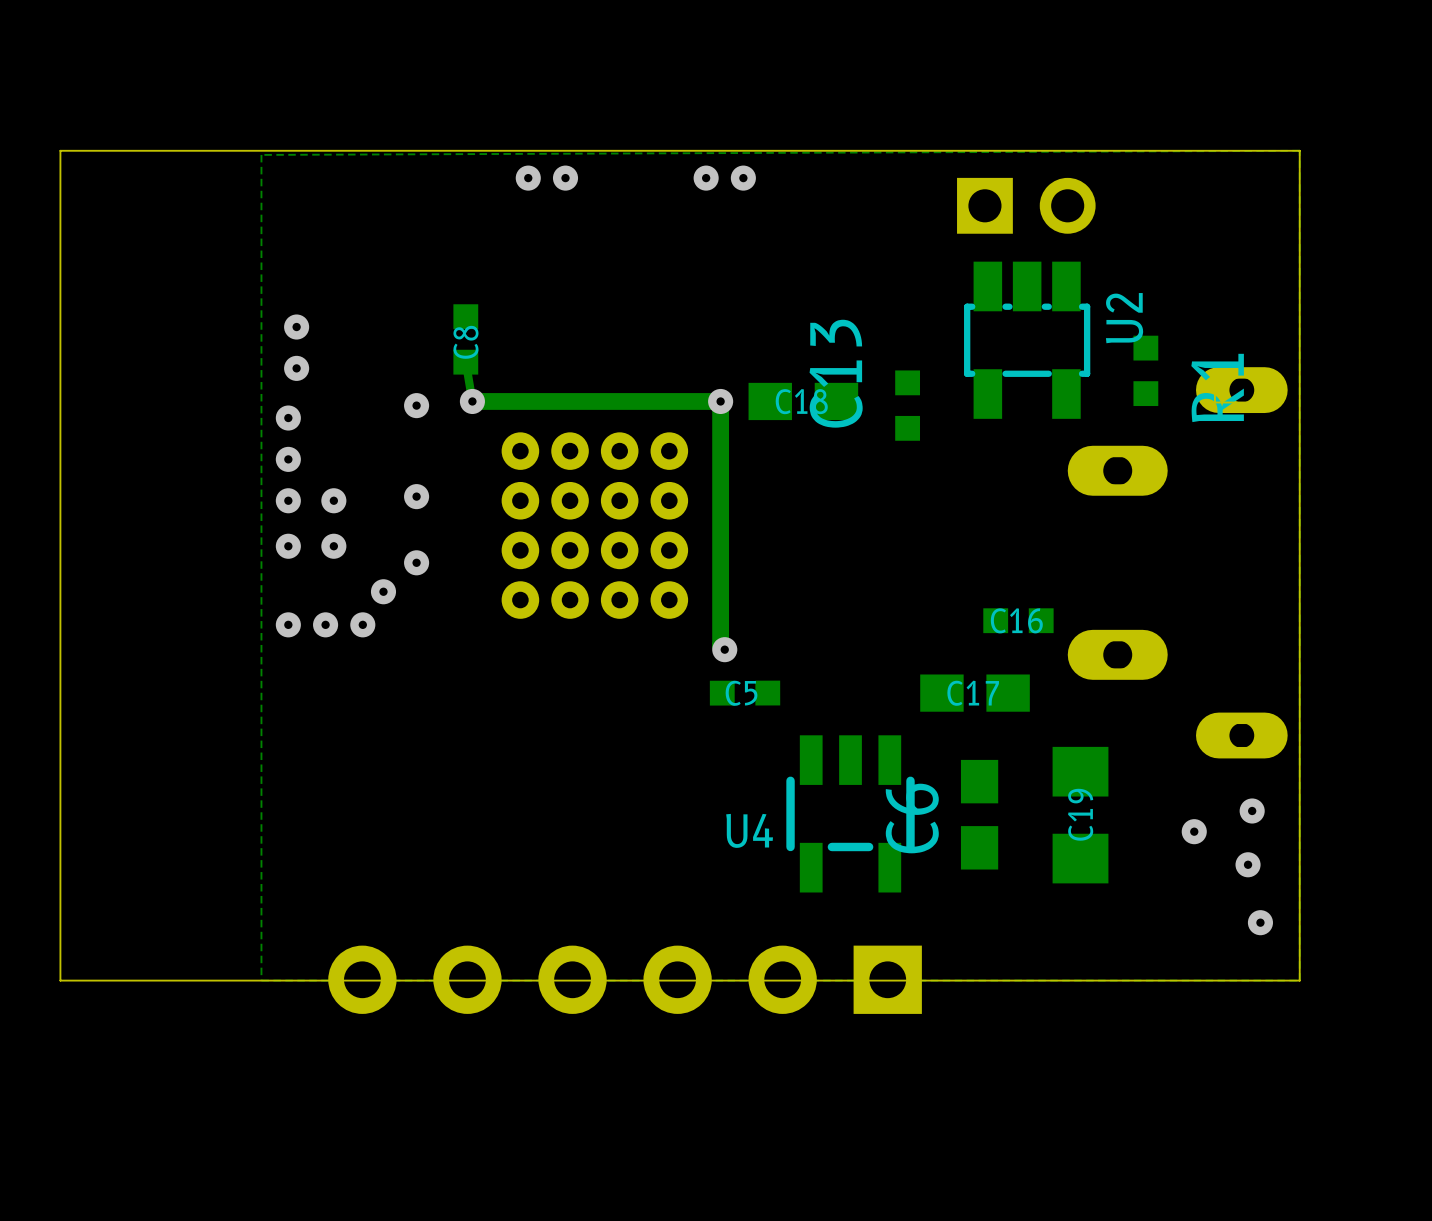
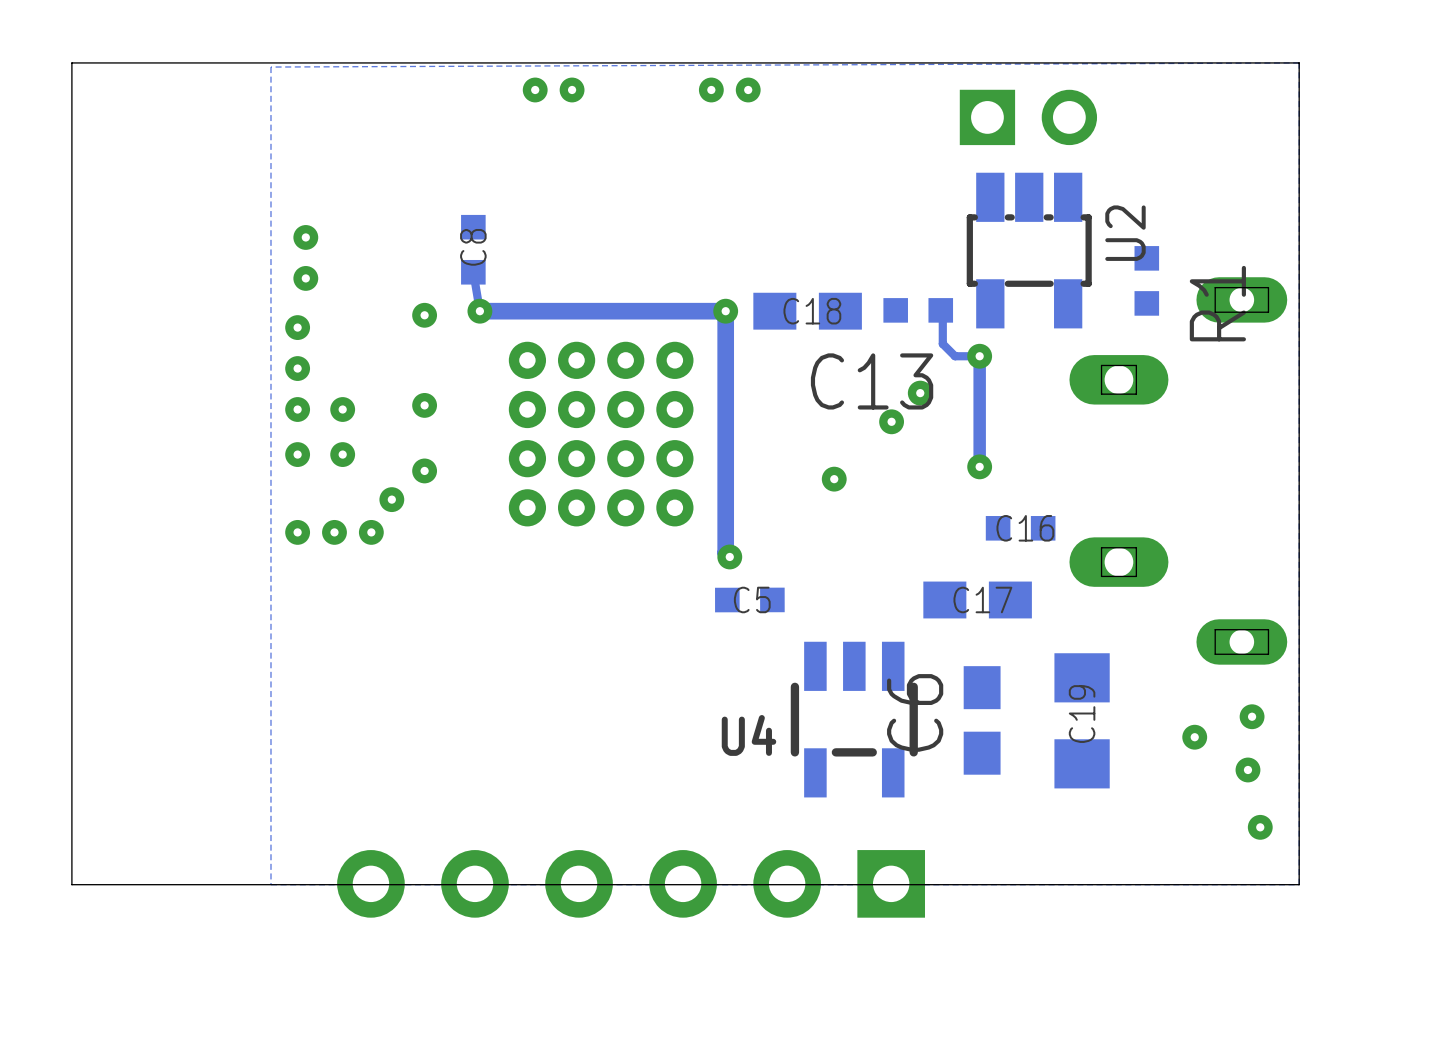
C13 name position: C13 (836, 373) -> C13 (872, 381)
track: none -> (940, 310) (942, 312) (942, 343) (955, 356) (979, 356) (979, 466)
C13 rotation: 0° (907, 405) -> 90° clockwise (918, 310)
via: none -> (979, 356)
via: none -> (920, 393)
via: none -> (891, 421)
via: none -> (979, 466)
via: none -> (834, 479)

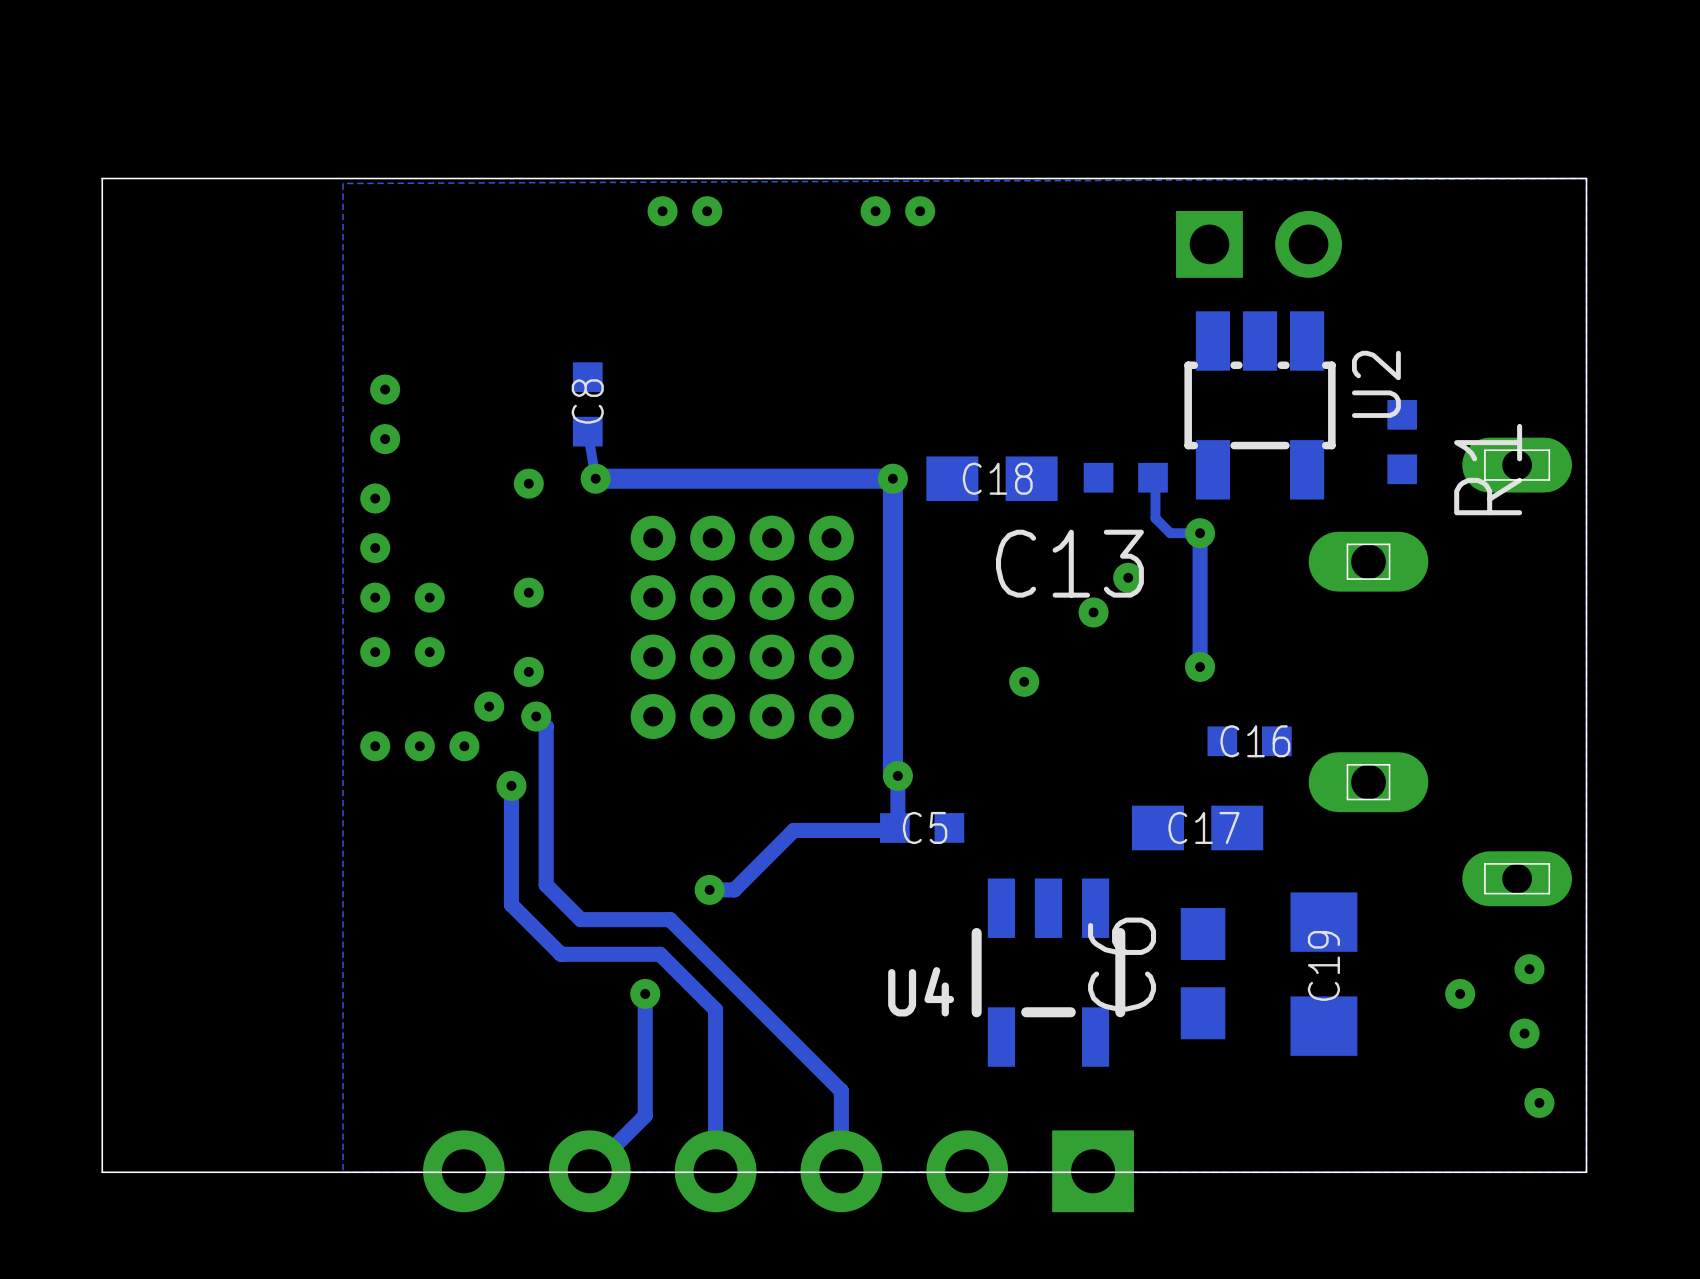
track: none -> (536, 716) (546, 726) (546, 884) (580, 919) (670, 919) (841, 1091) (841, 1171)
via: none -> (536, 716)
track: none -> (897, 775) (897, 825) (892, 830) (793, 830) (734, 889) (709, 889)
track: none -> (511, 785) (511, 904) (561, 954) (660, 954) (715, 1009) (715, 1171)
via: none -> (511, 785)
via: none -> (709, 889)
track: none -> (645, 993) (645, 1115) (589, 1171)
via: none -> (645, 993)

